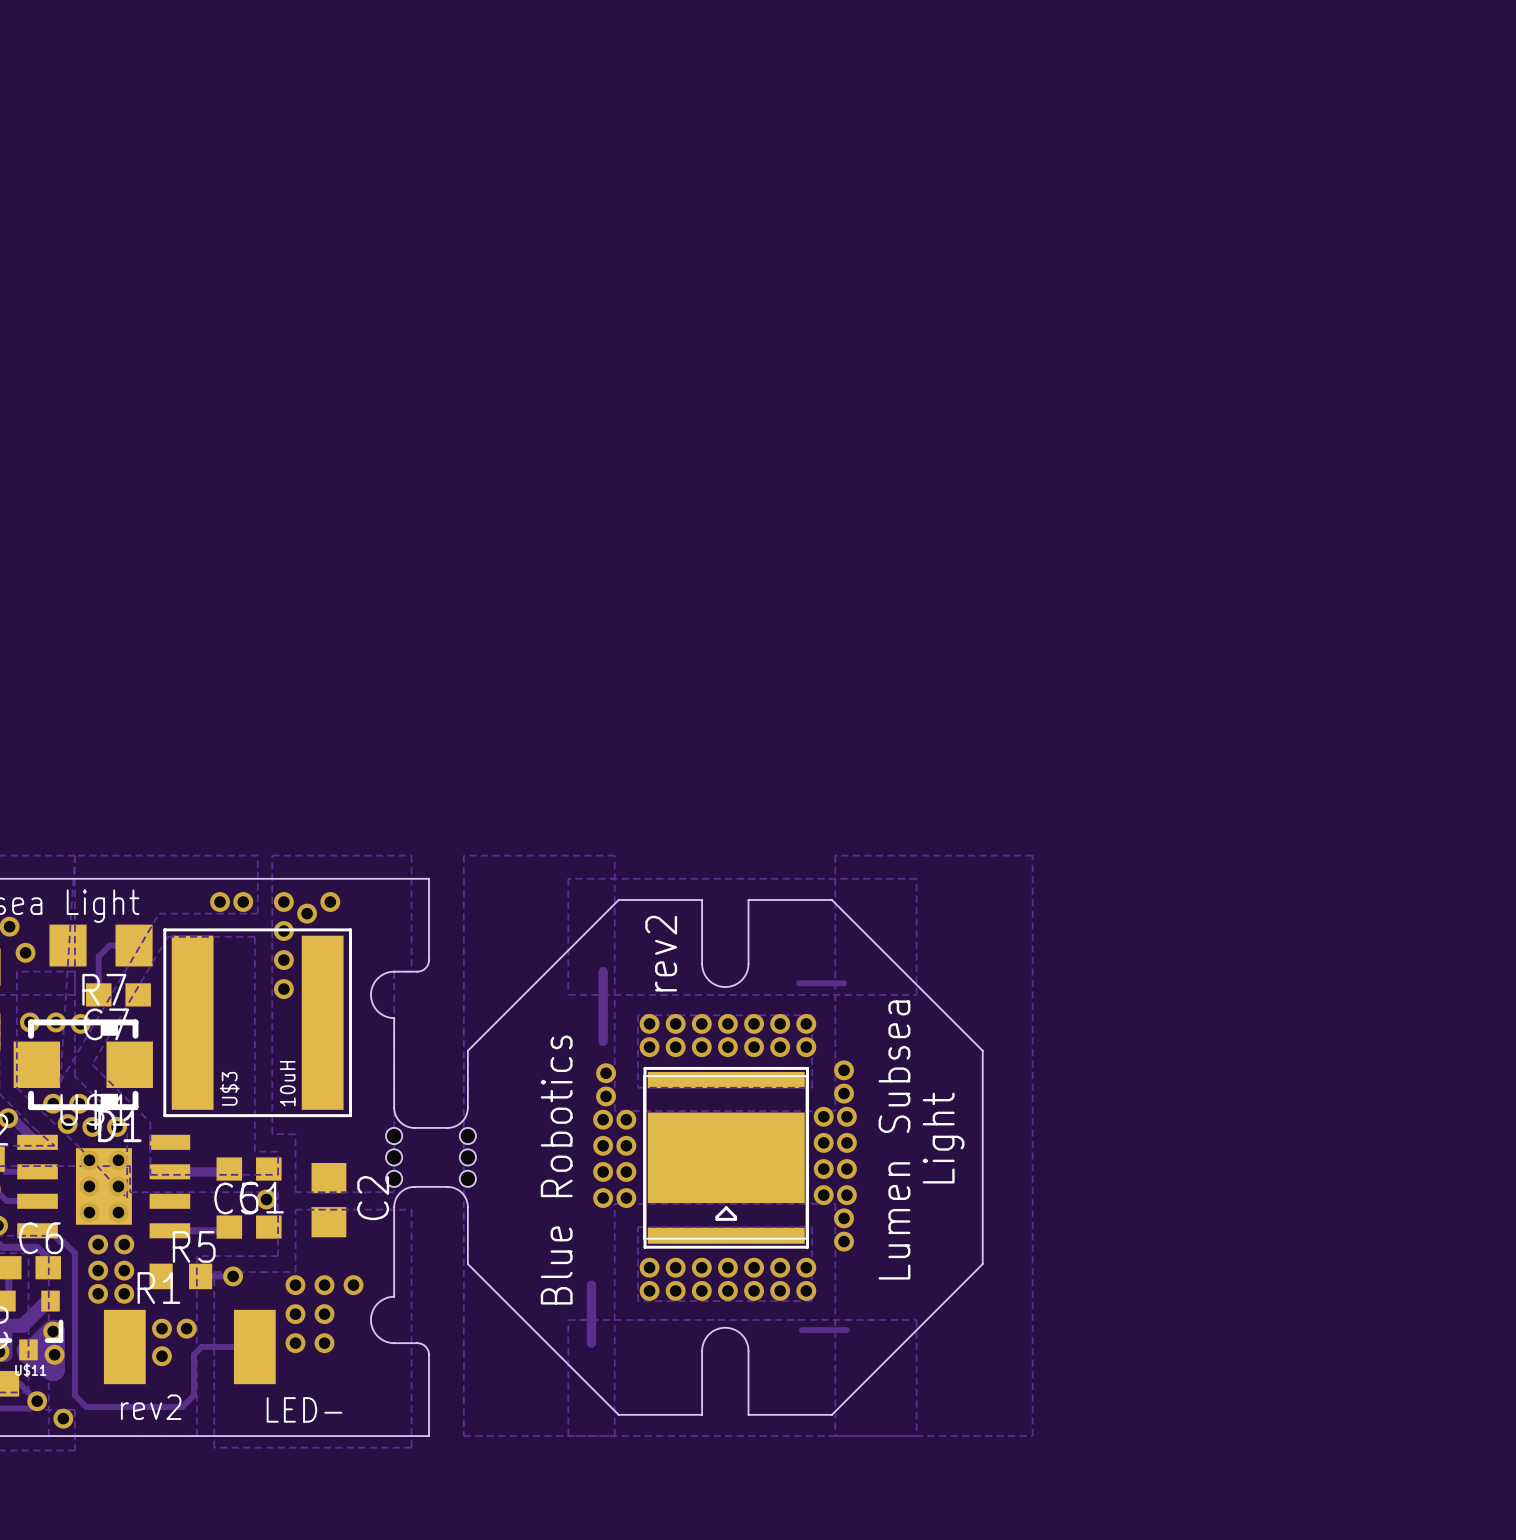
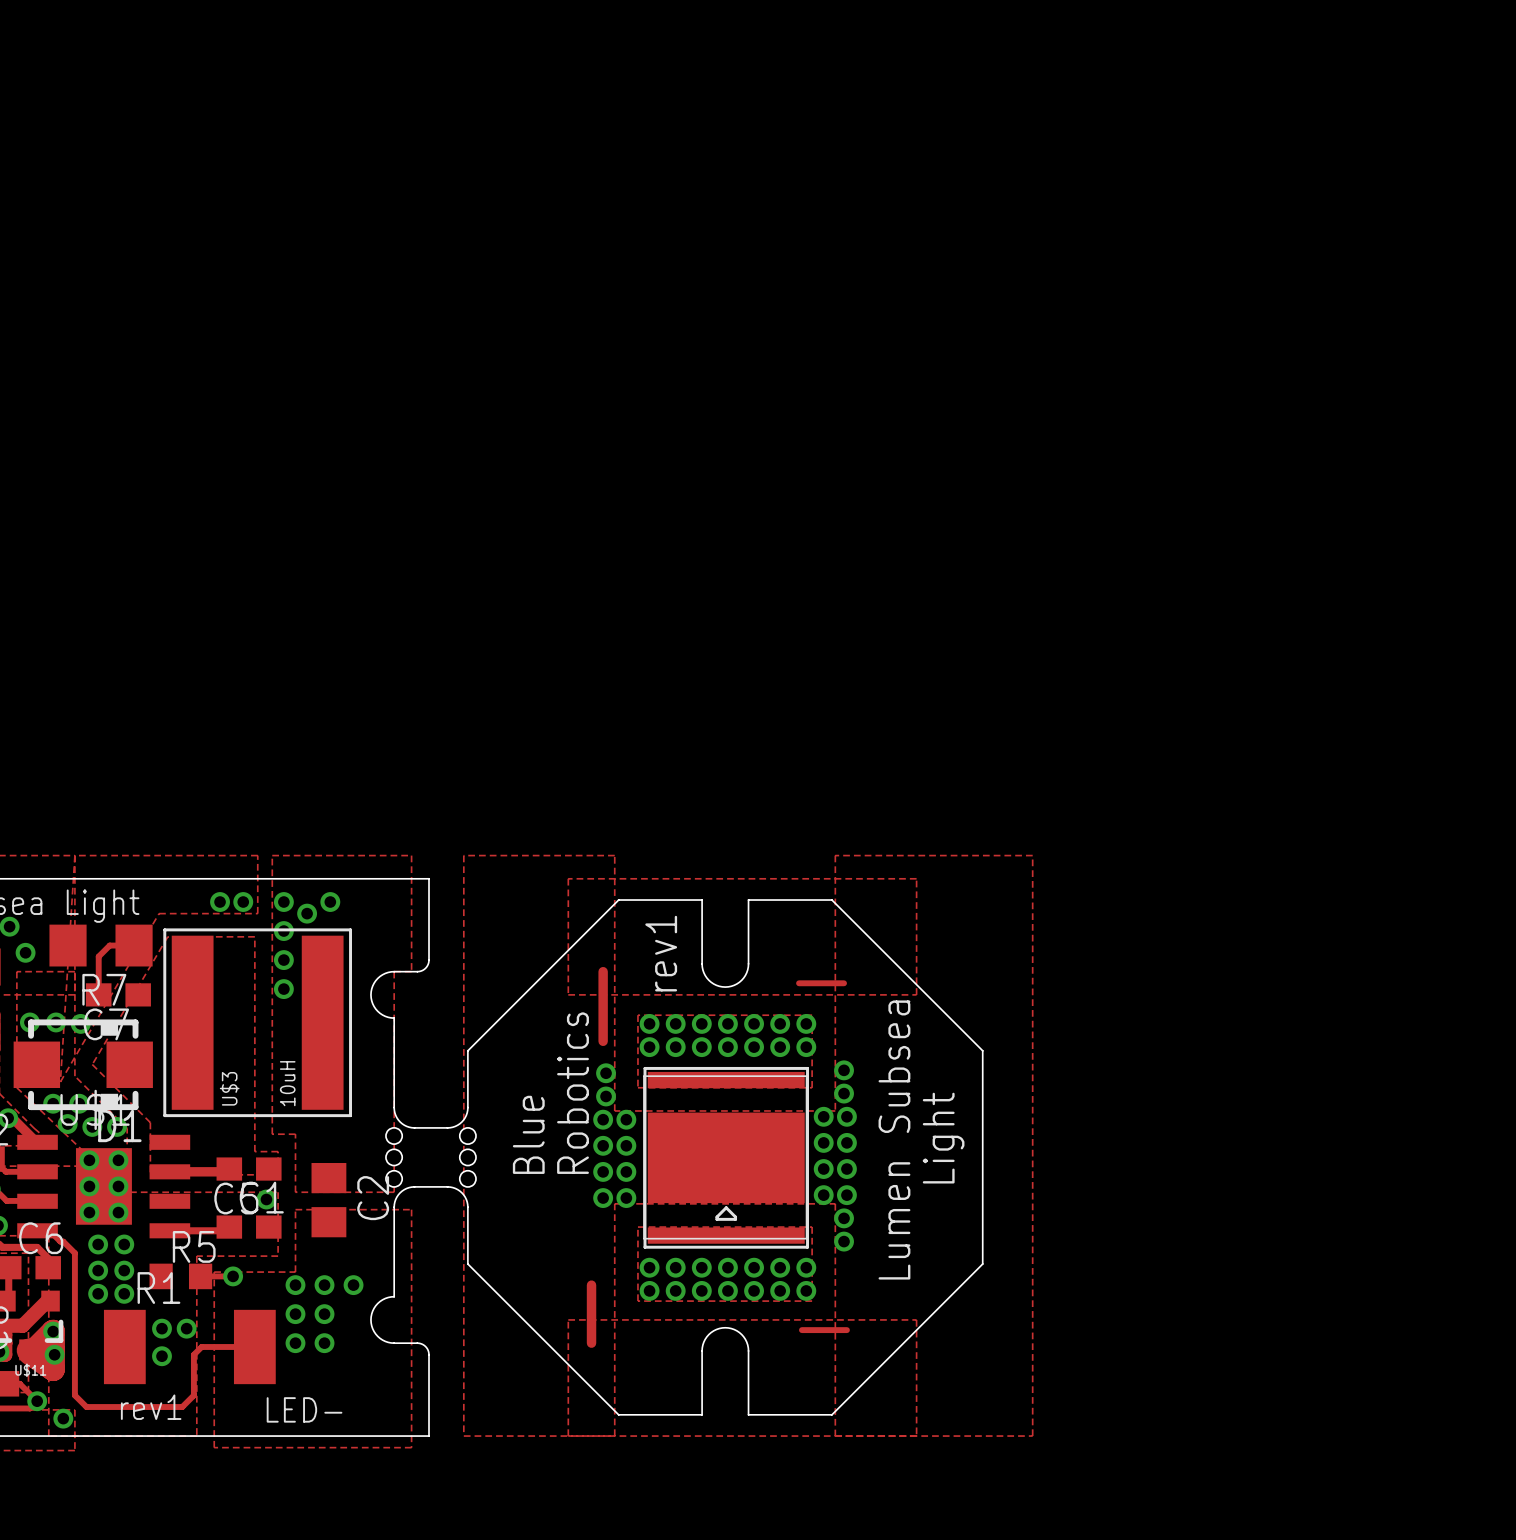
text: rev2 (661, 953) -> rev1 (661, 953)
text: none -> Blue (528, 1134)
text: Blue Robotics (556, 1170) -> Robotics (573, 1093)
text: rev2 (151, 1407) -> rev1 (151, 1407)

